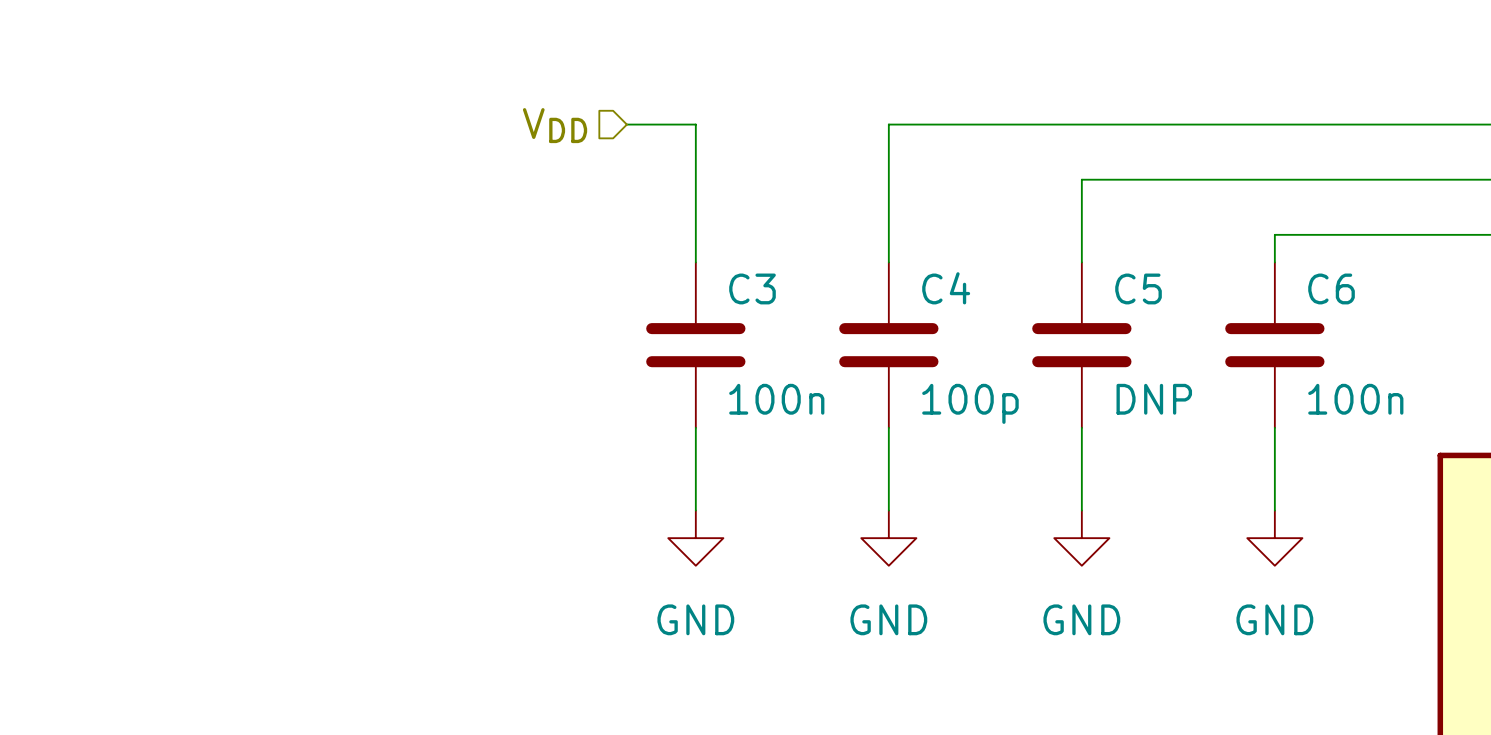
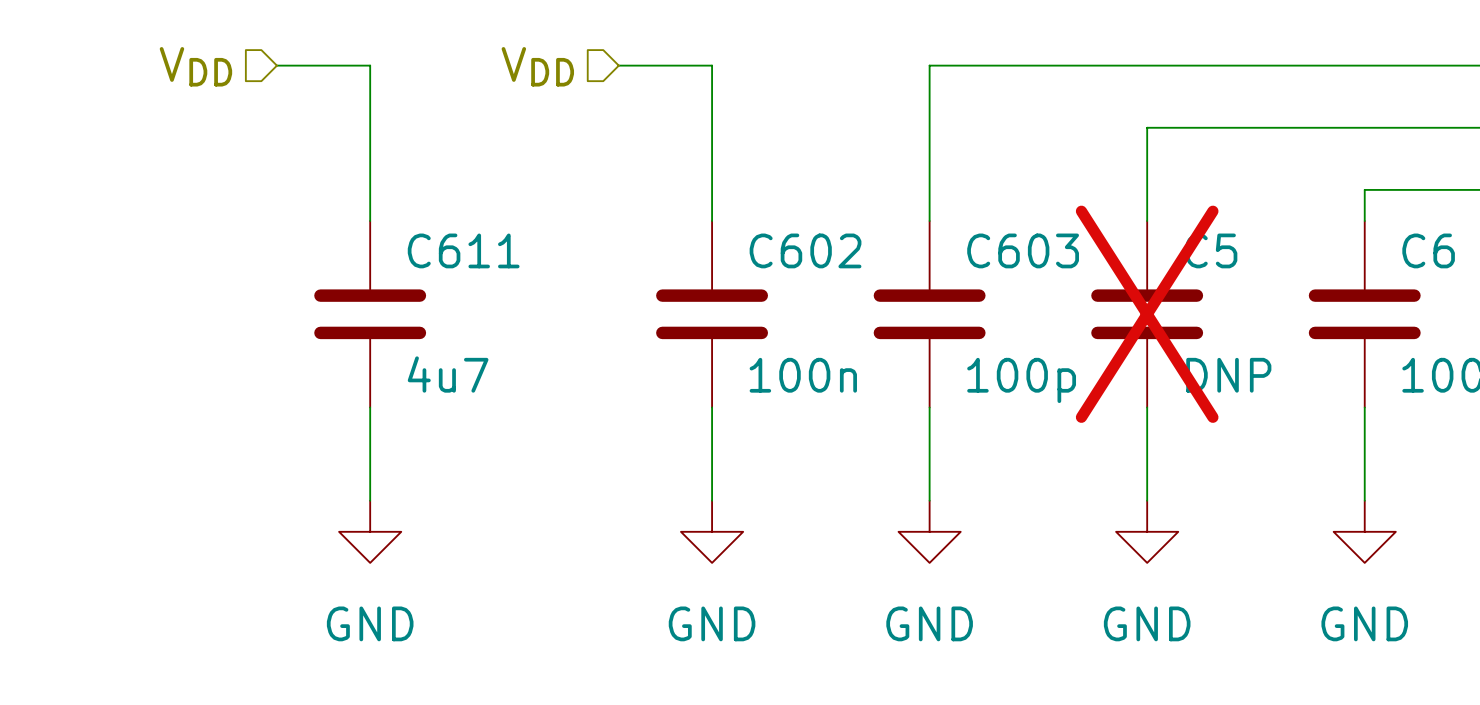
wire: none -> (276, 65) (370, 65) (370, 221)
wire: none -> (618, 65) (634, 65)
hierarchical label: none -> VDD (195, 66)
hierarchical label position: VDD (555, 125) -> VDD (537, 66)
C3 name: C3 (752, 288) -> C602 (805, 250)
C4 name: C4 (946, 288) -> C603 (1023, 250)
C611: none -> 4u7 (370, 314)
C5 do-not-place cross: none -> (1147, 314)
wire: none -> (370, 407) (370, 500)
power symbol: none -> GND (370, 531)

